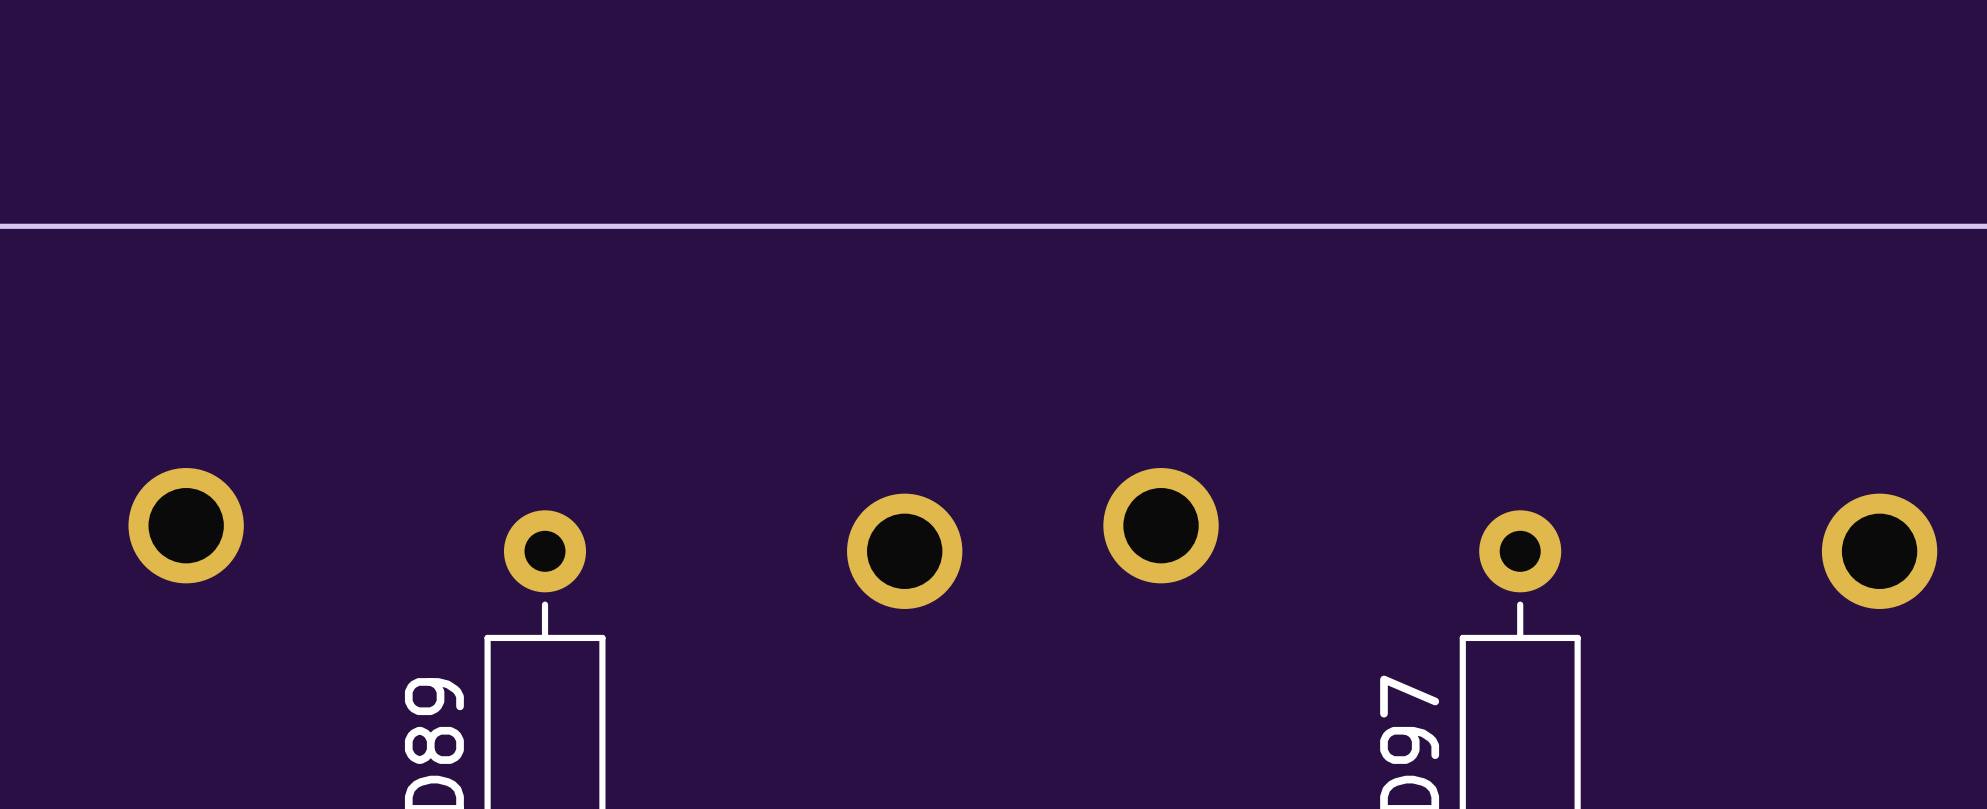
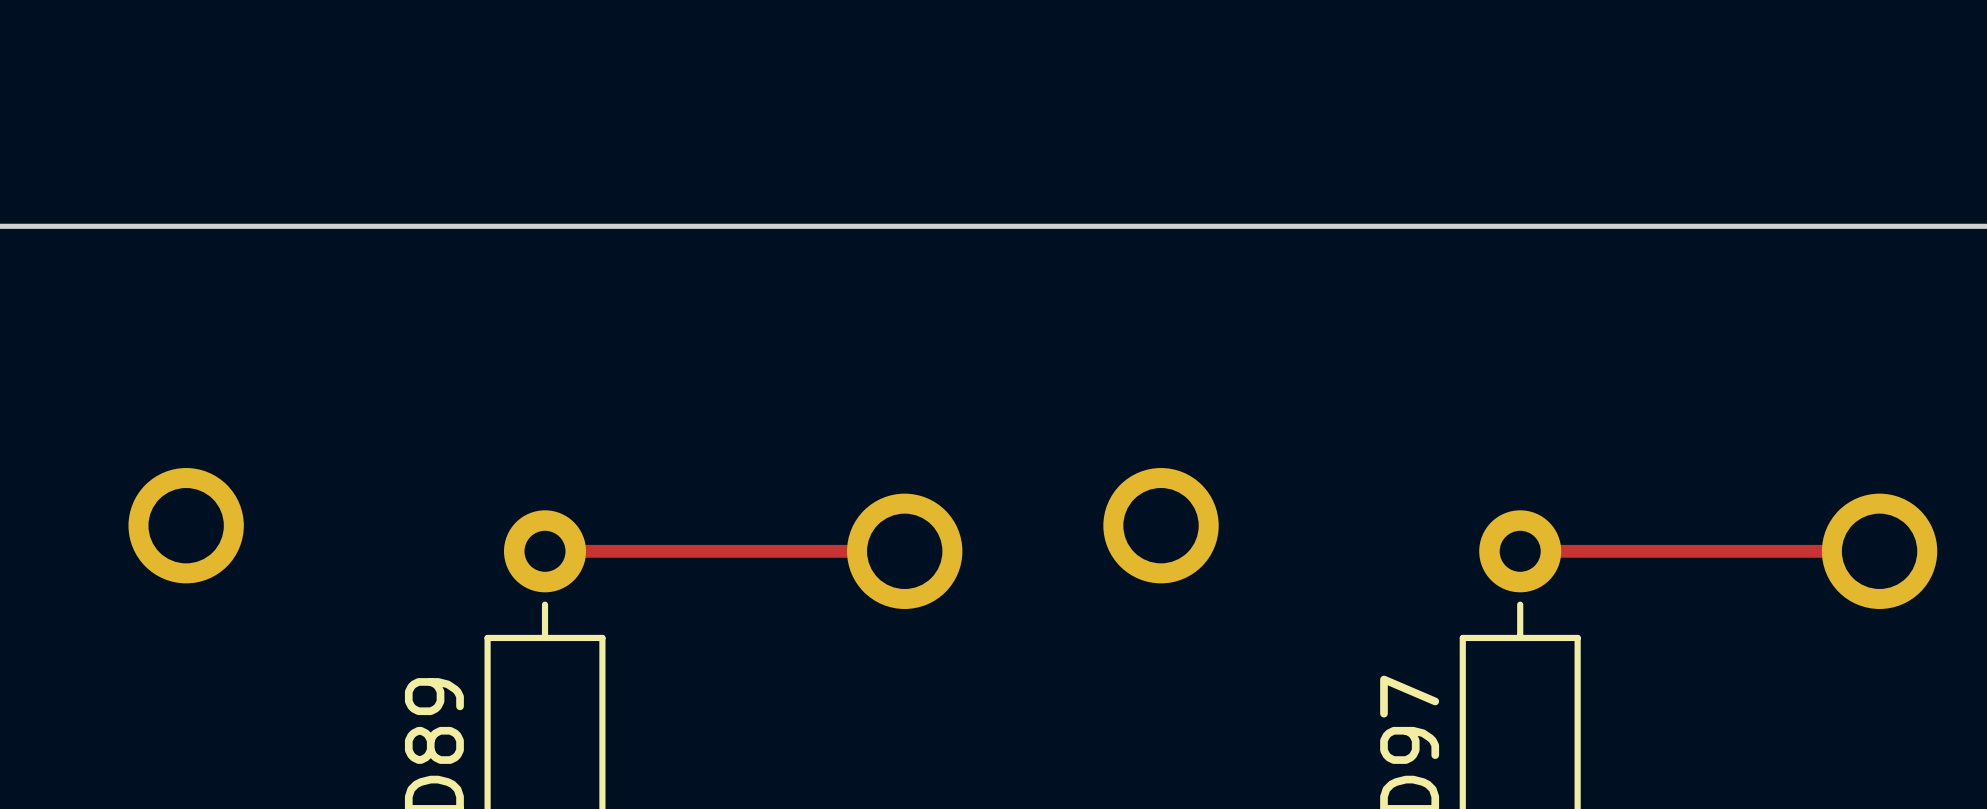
track: none -> (545, 551) (904, 551)
track: none -> (1520, 551) (1879, 551)

